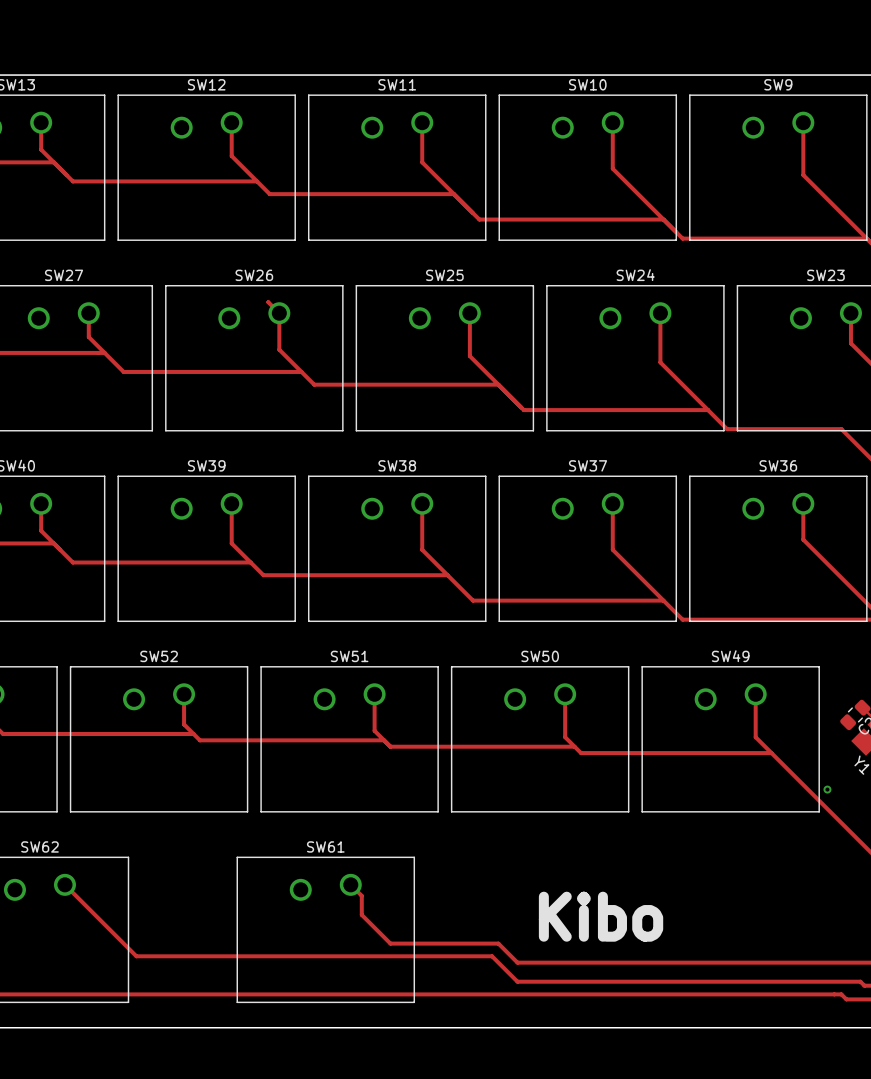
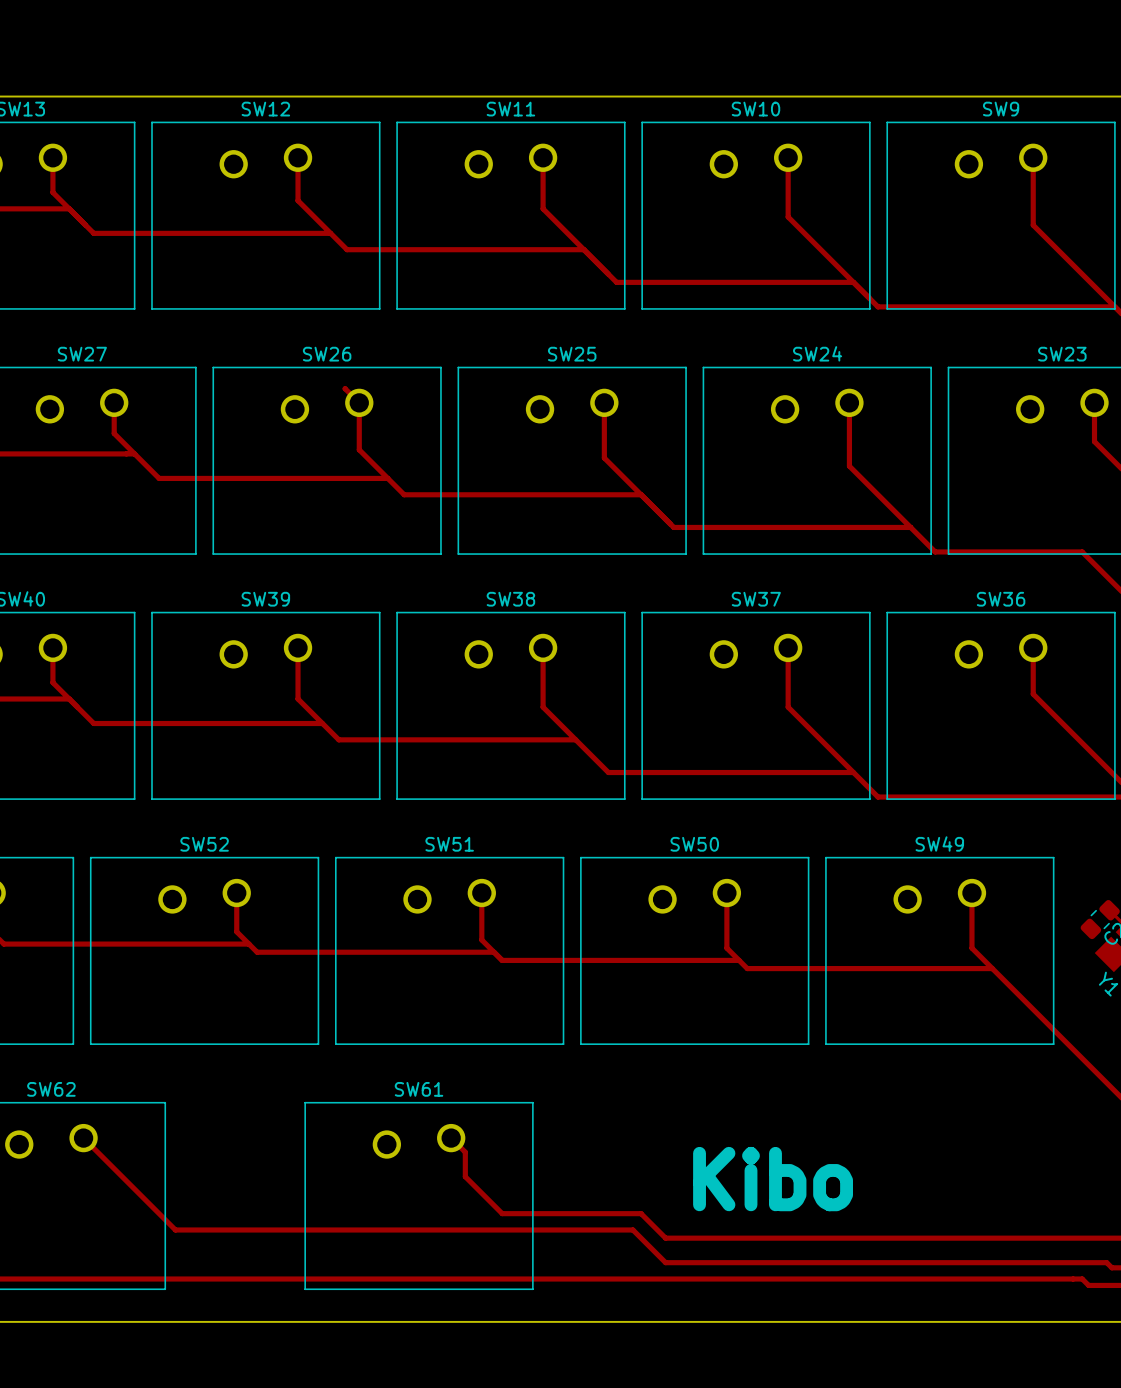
via: (827, 789) -> none

